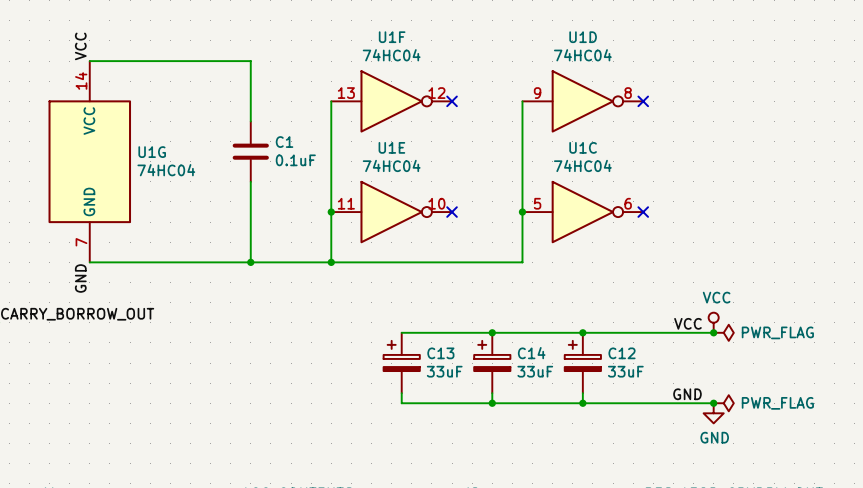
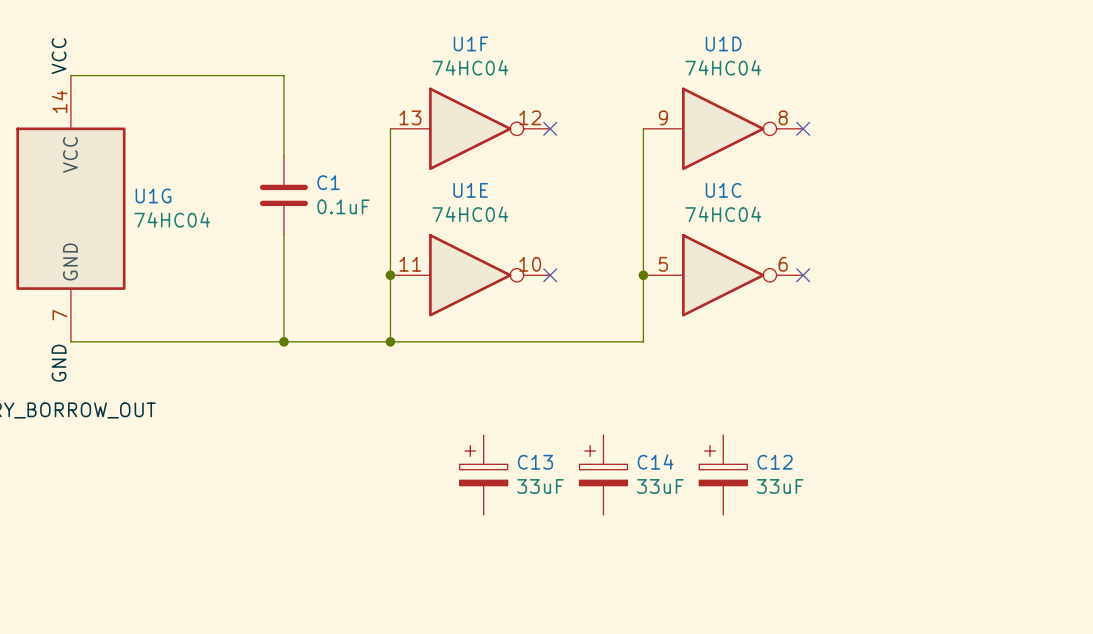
power symbol: VCC (713, 322) -> none
label: VCC (687, 323) -> none
wire: (401, 332) (713, 332) -> none
junction: (492, 332) -> none
junction: (582, 332) -> none
junction: (713, 332) -> none
power symbol: PWR_FLAG (723, 332) -> none
wire: (401, 393) (401, 403) (713, 403) -> none
wire: (492, 393) (492, 403) -> none
wire: (582, 393) (582, 403) -> none
label: GND (687, 394) -> none
junction: (492, 403) -> none
junction: (582, 403) -> none
junction: (713, 403) -> none
power symbol: PWR_FLAG (723, 403) -> none
power symbol: GND (713, 413) -> none

